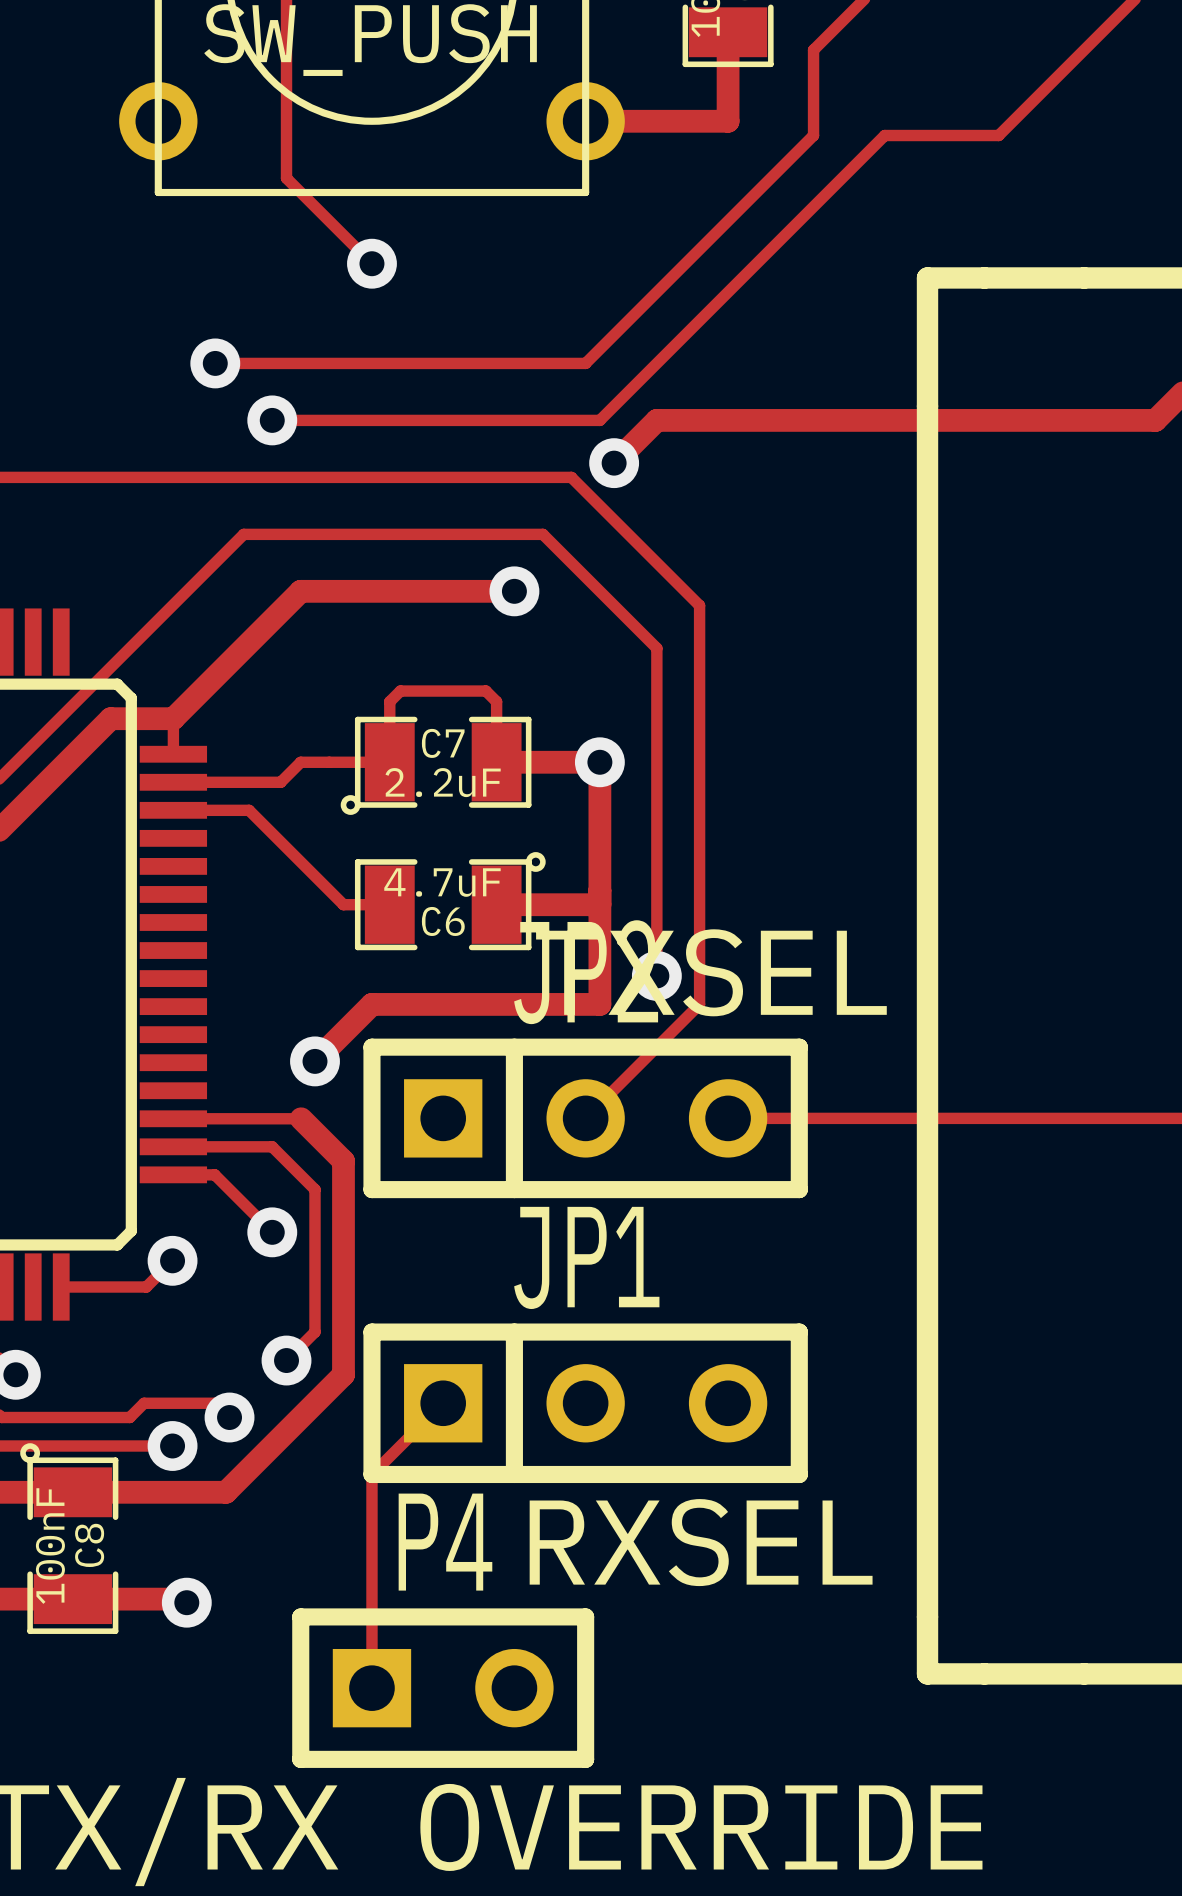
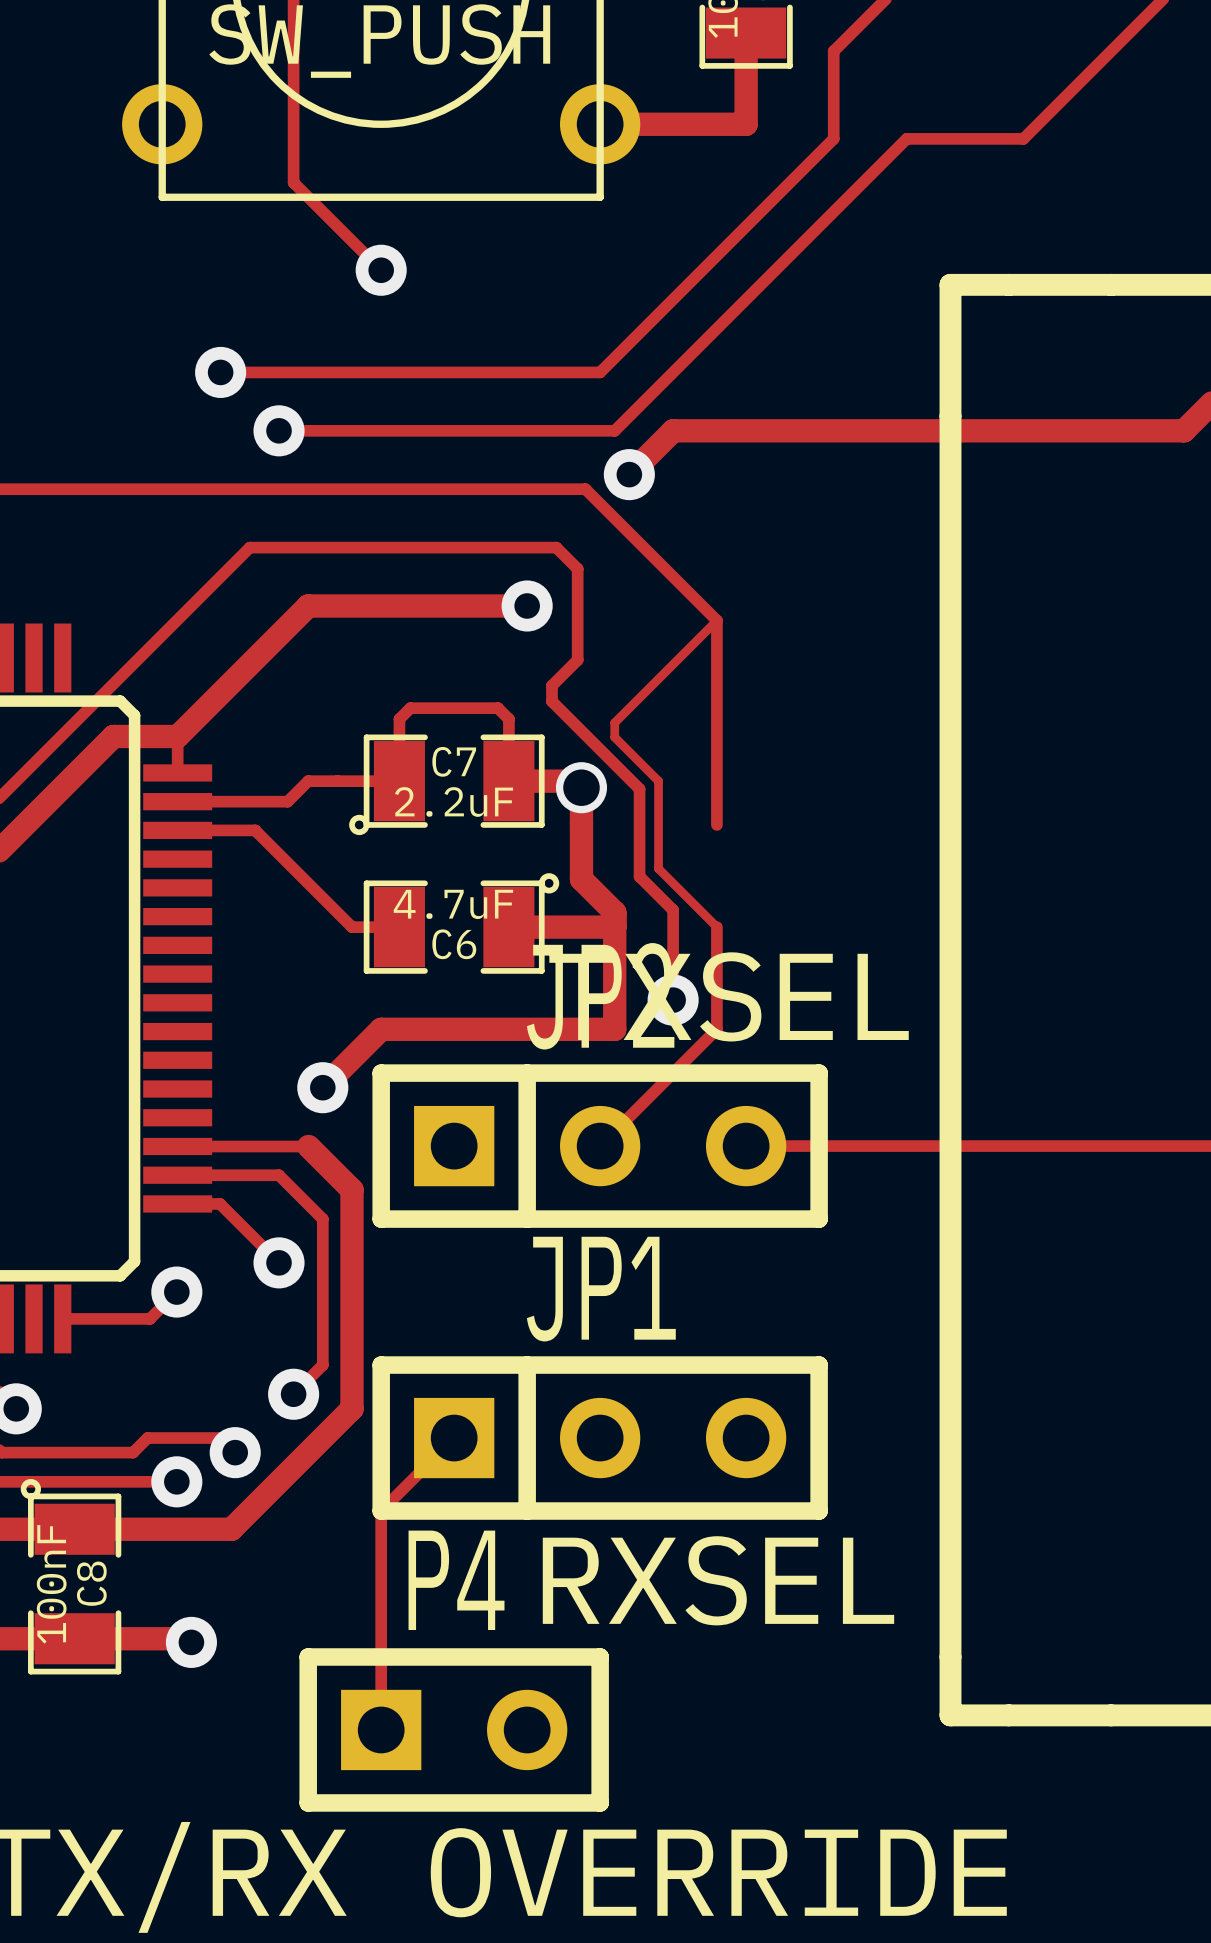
track: (563, 555) (656, 648) (656, 888) -> (577, 568) (577, 660) (551, 685) (551, 701) (639, 789) (639, 876) (673, 910)
track: (561, 762) (599, 762) (599, 890) -> (574, 781) (581, 787) (581, 879) (614, 912)
via position: (599, 762) -> (581, 787)
track: (699, 805) (699, 904) -> (716, 620) (614, 722) (614, 737) (658, 781) (658, 868) (716, 927)

